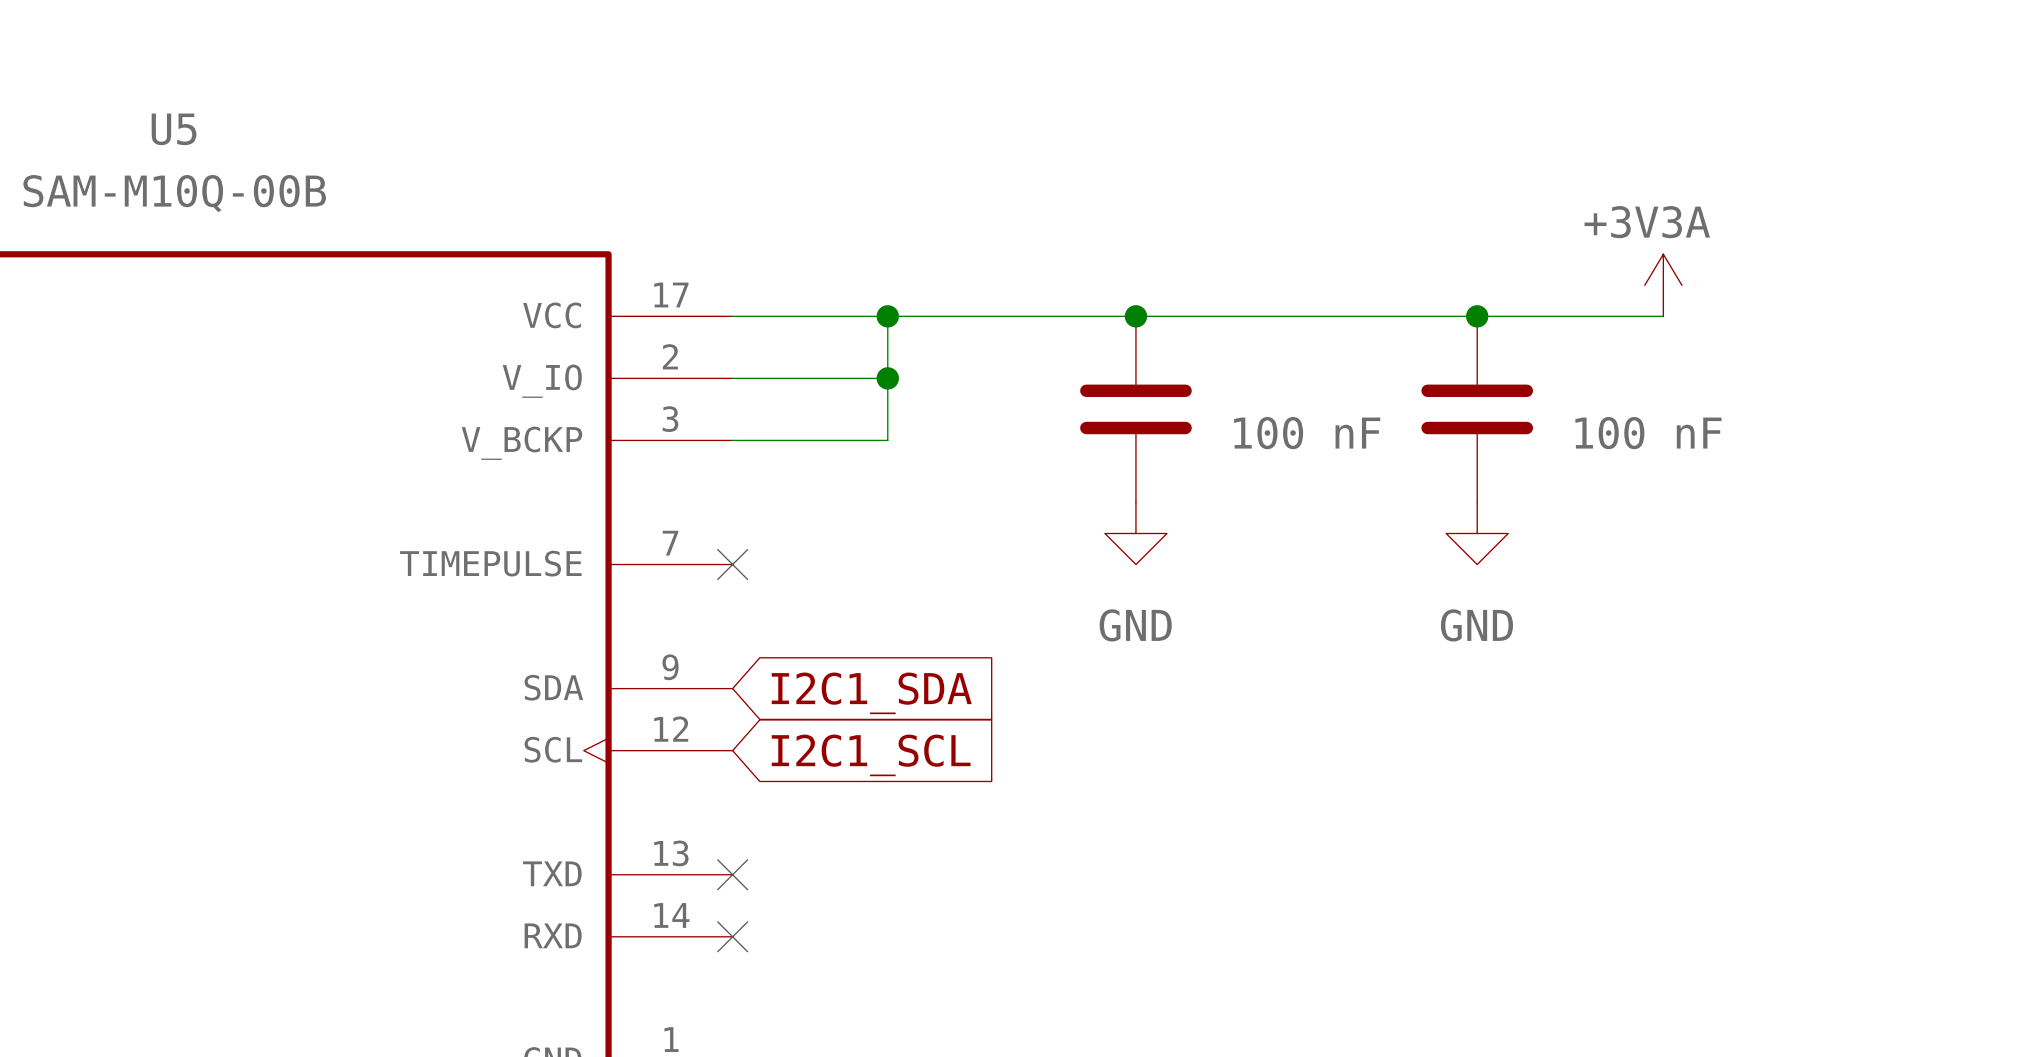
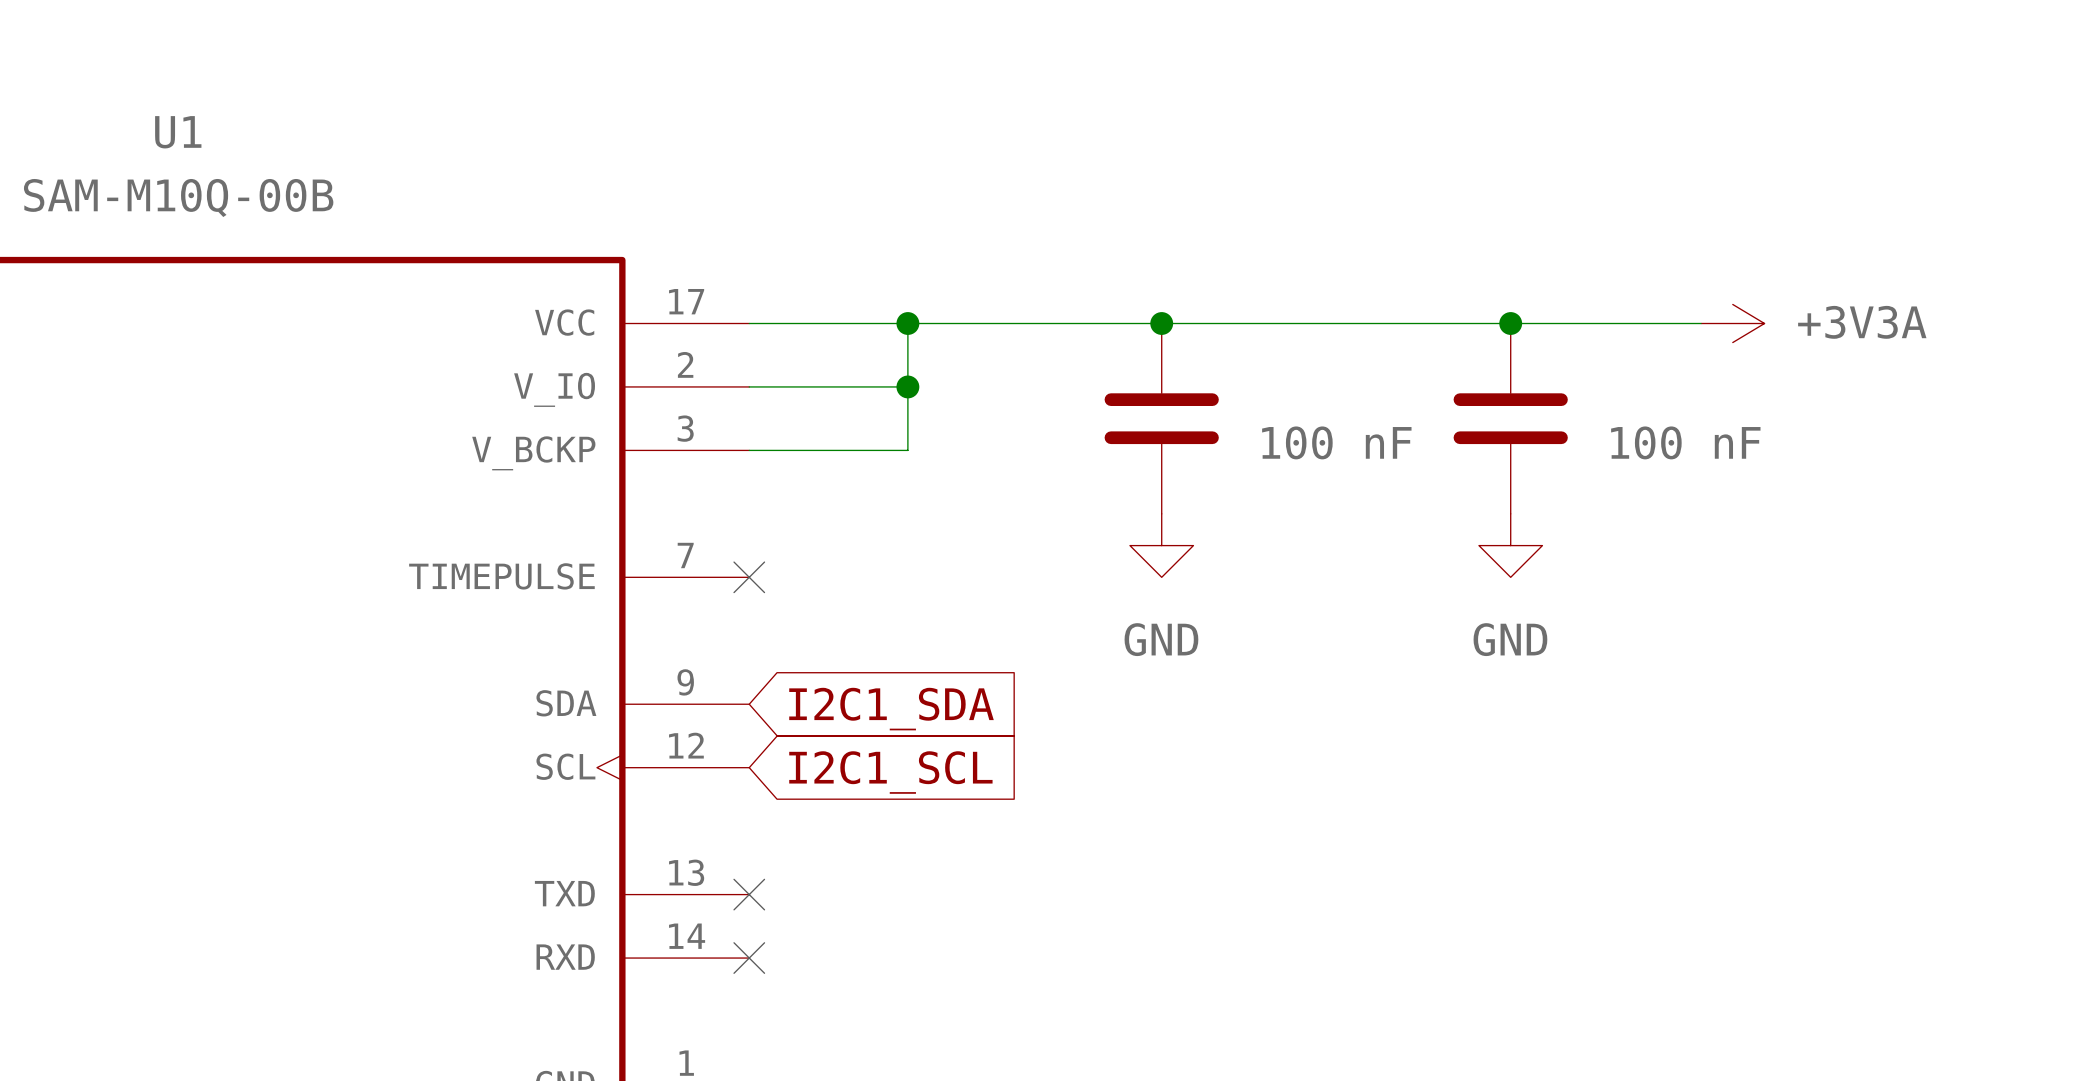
U5 name: U5 (174, 129) -> U1 (178, 132)
power symbol text position: +3V3A (1647, 222) -> +3V3A (1862, 322)
power symbol rotation: 0° (1663, 285) -> 90° clockwise (1732, 323)
power symbol position: +3V3A (1663, 285) -> +3V3A (1732, 323)

